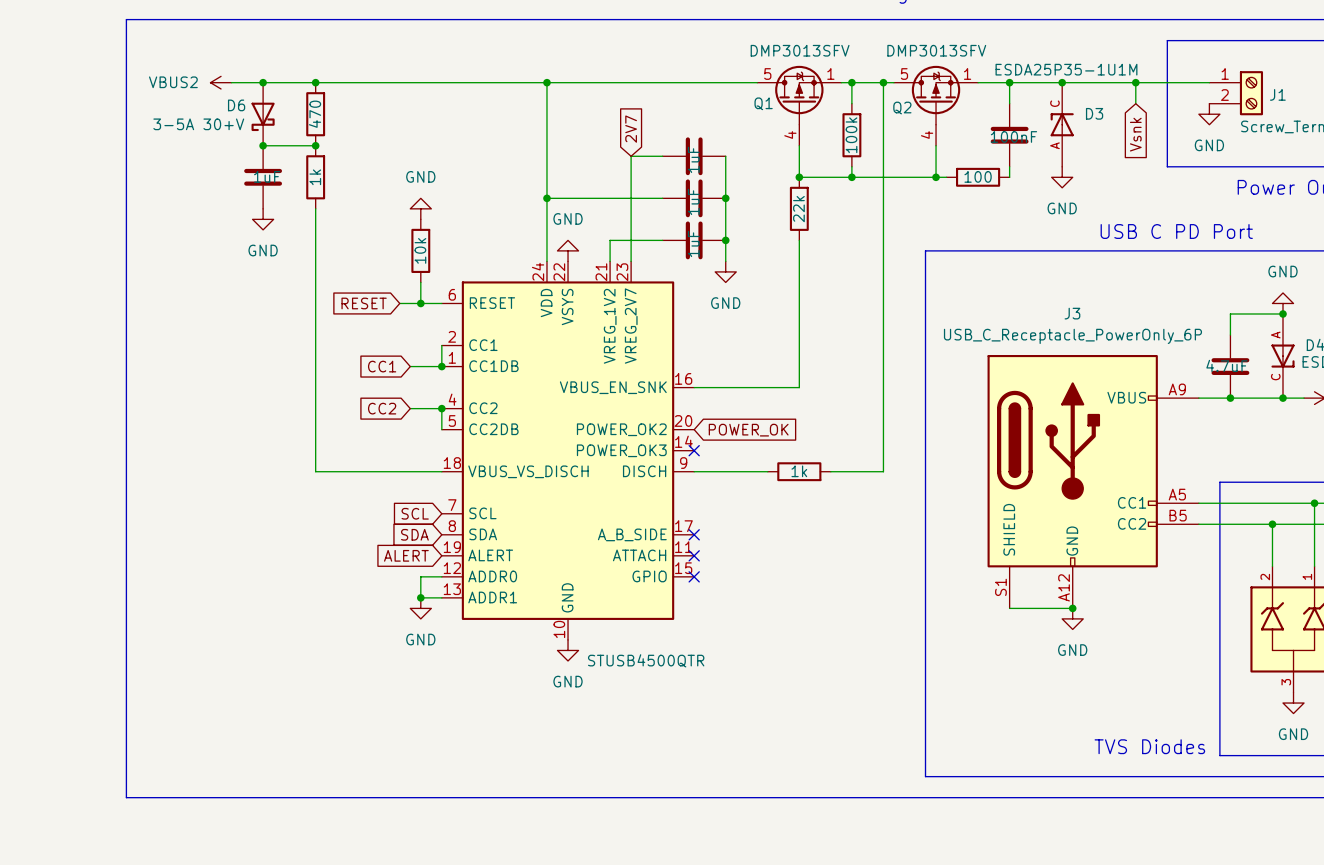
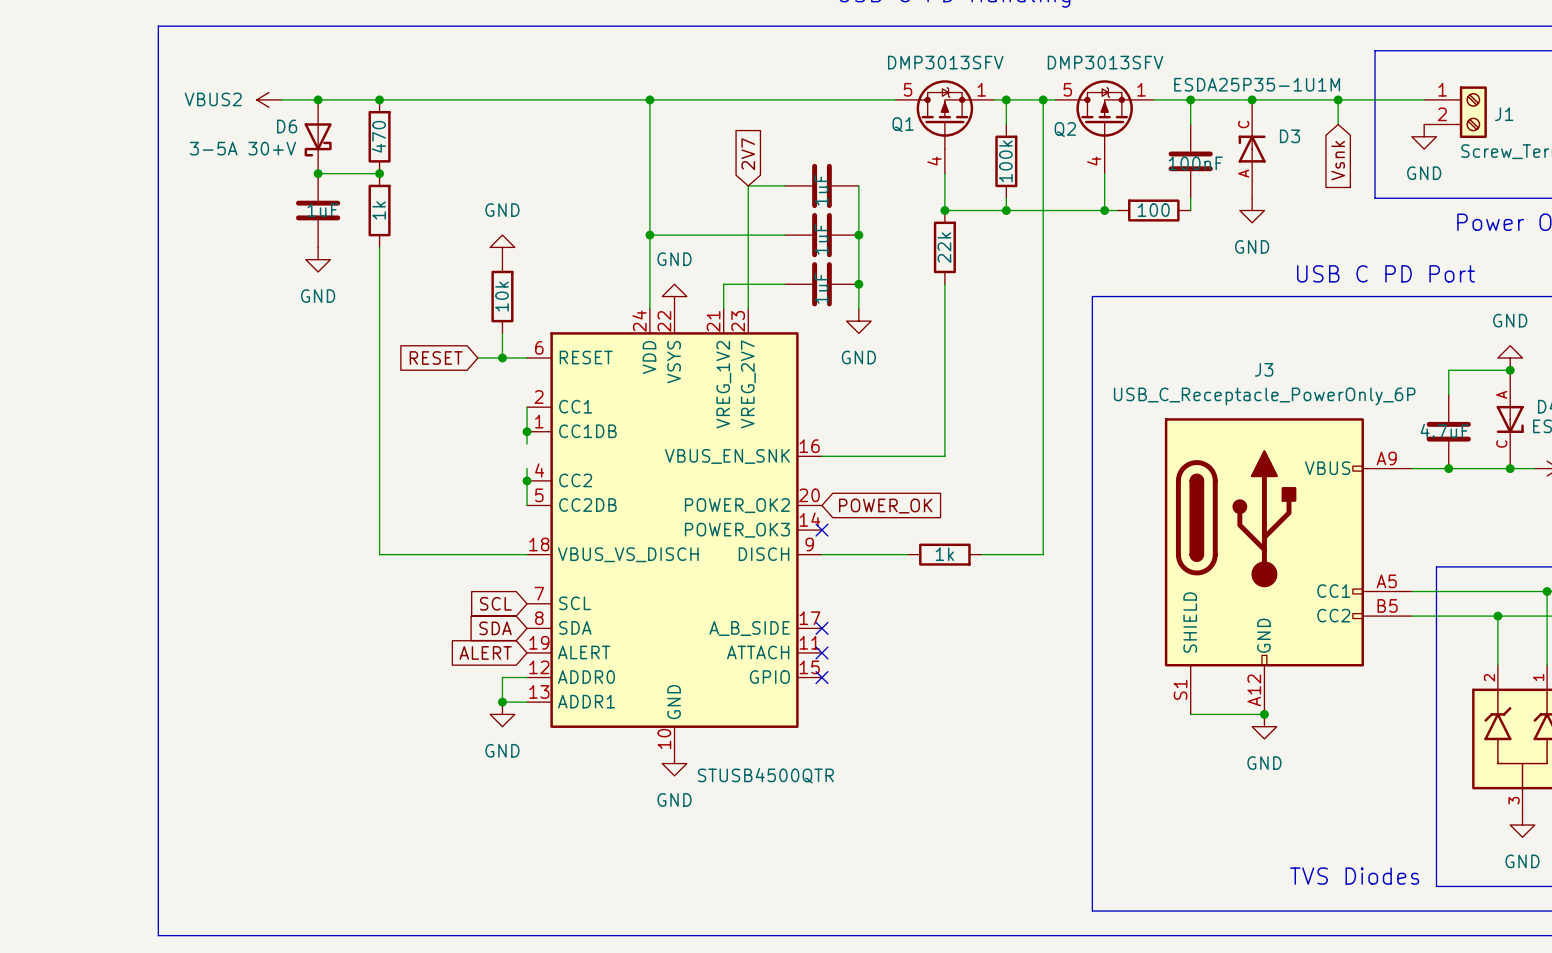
global label: CC1 (382, 366) -> none
wire: (410, 366) (441, 366) -> (527, 444) (527, 431)
global label: CC2 (382, 408) -> none
wire: (410, 408) (441, 408) -> (527, 468) (527, 480)

